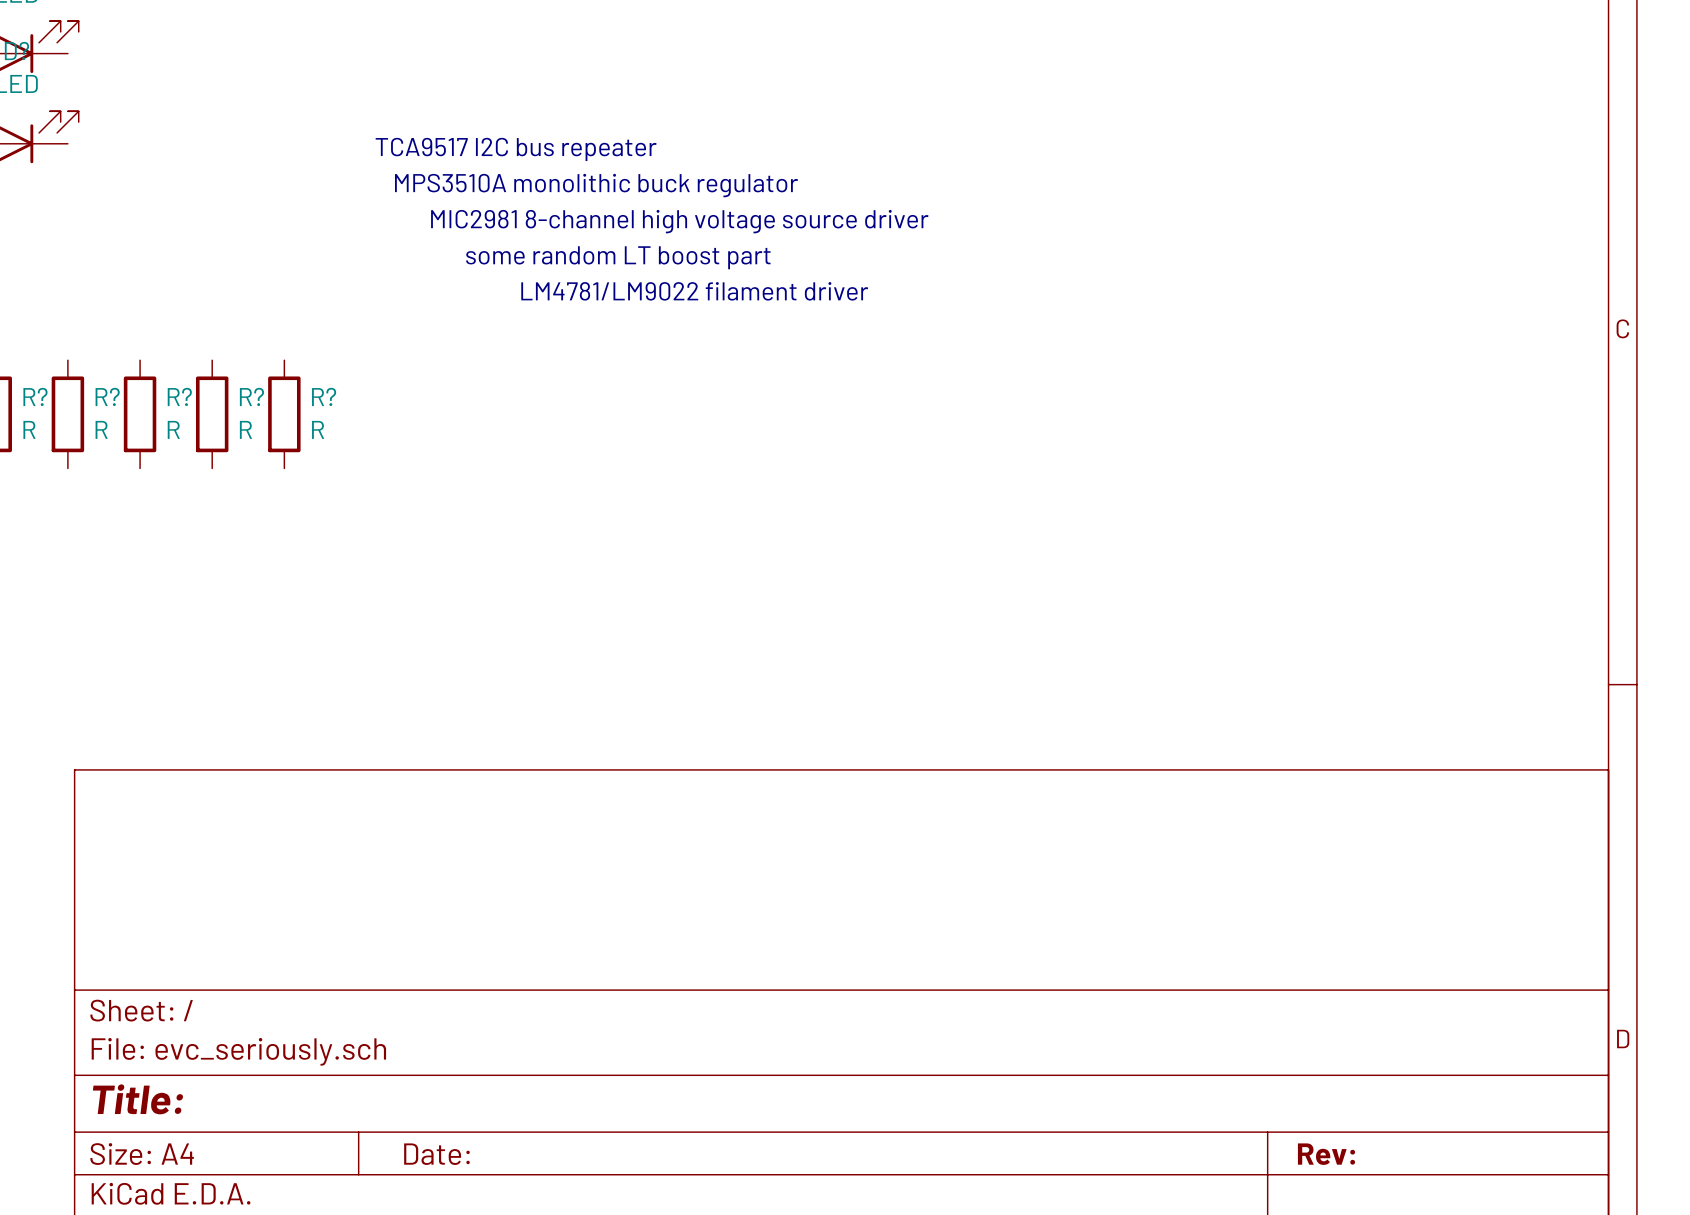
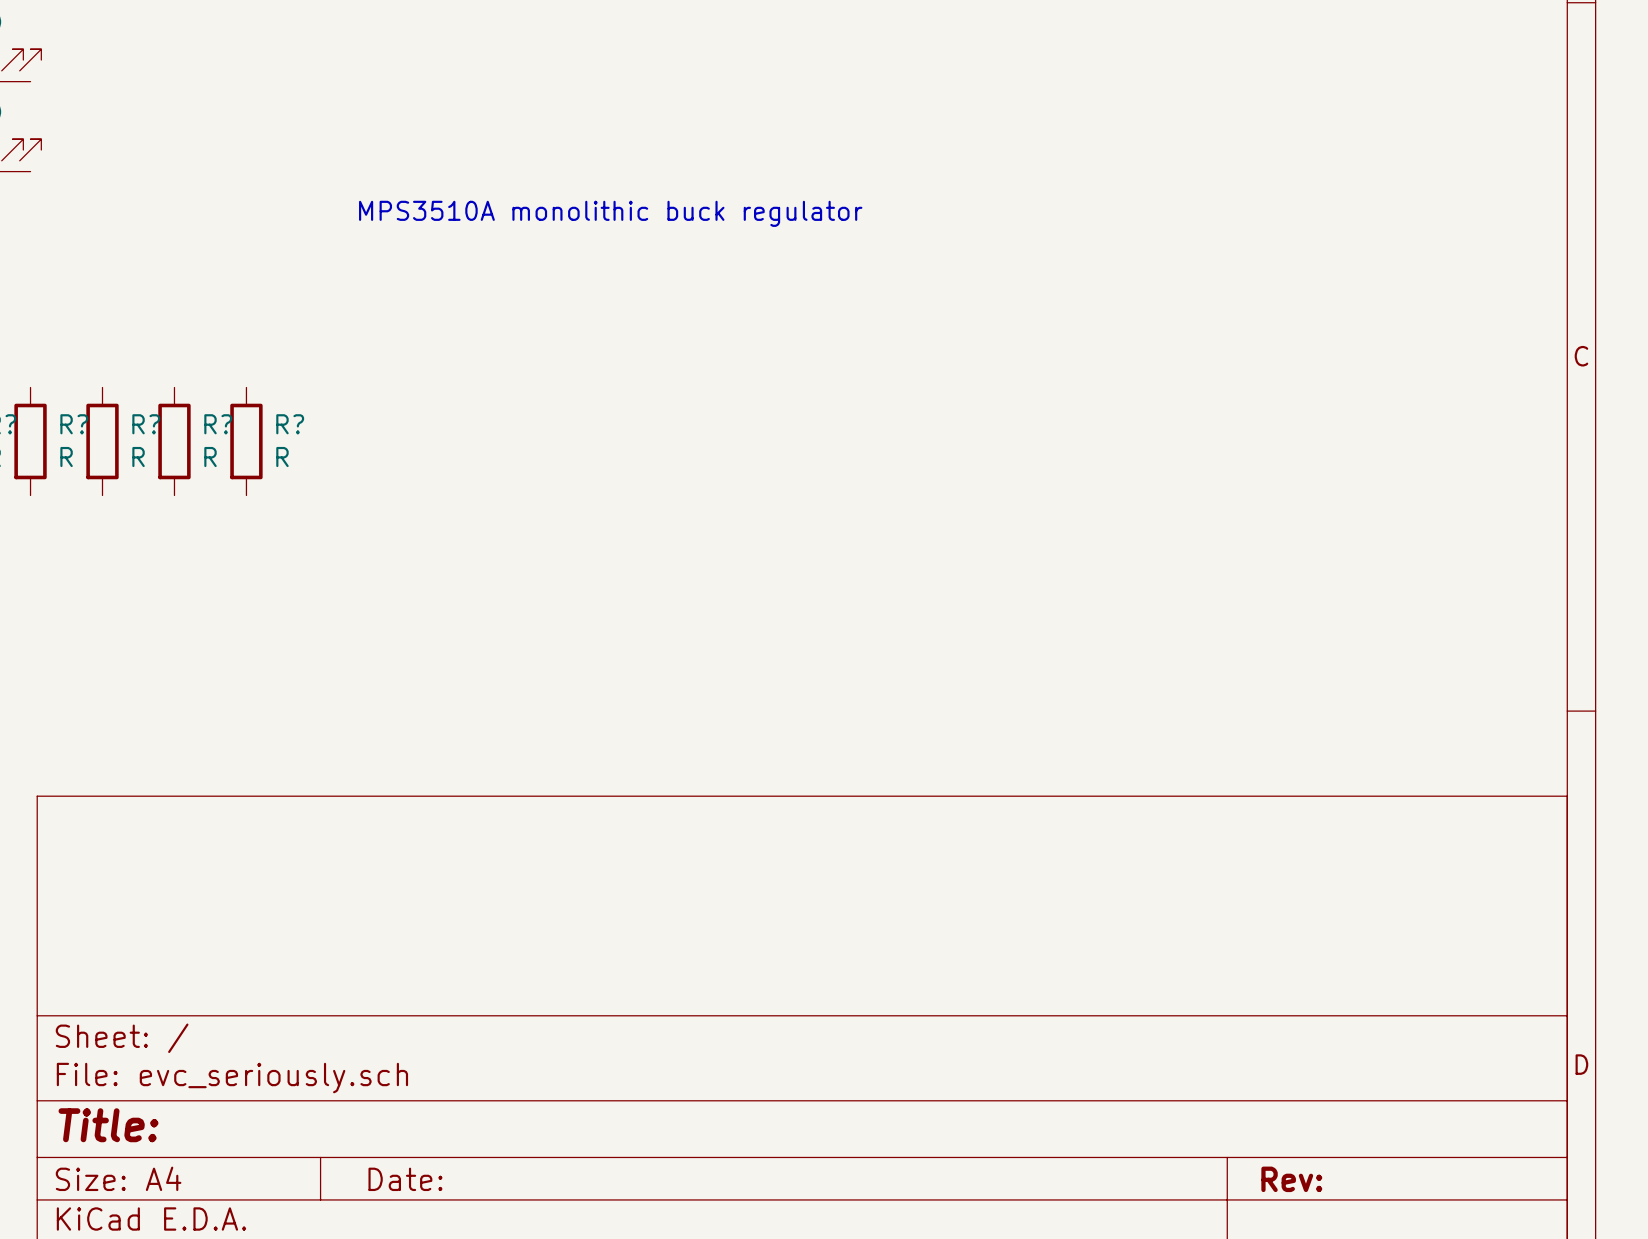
text: TCA9517 I2C bus repeater (516, 149) -> none
text: MIC2981 8-channel high voltage source driver (679, 221) -> none
text: some random LT boost part (618, 257) -> none
text: LM4781/LM9022 filament driver (694, 291) -> none

